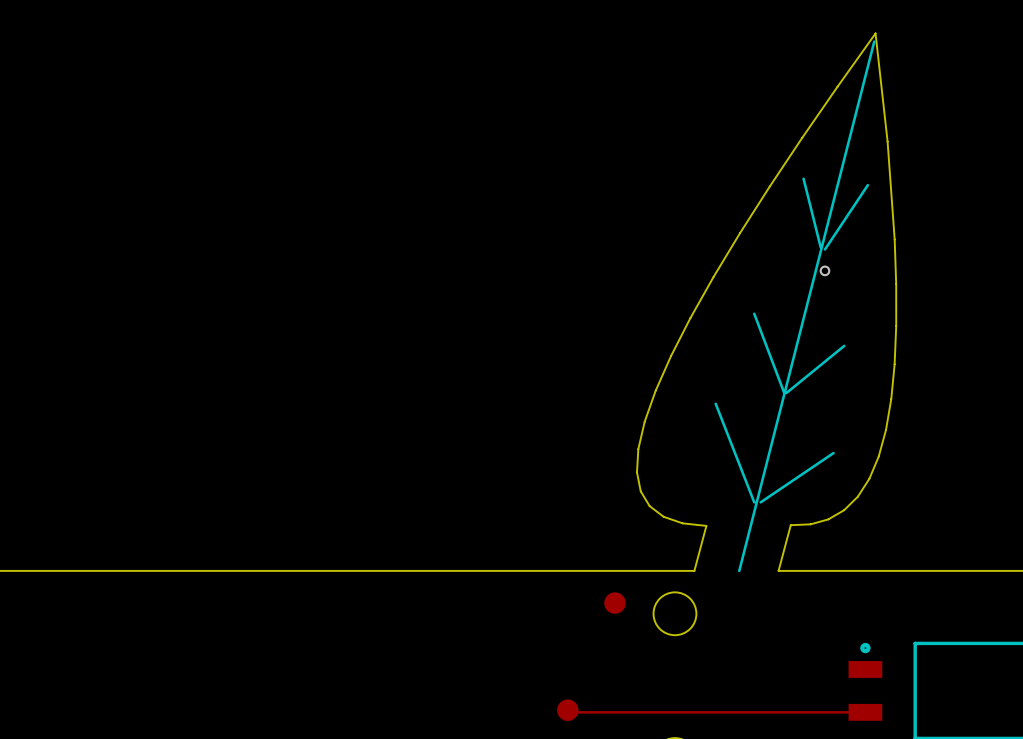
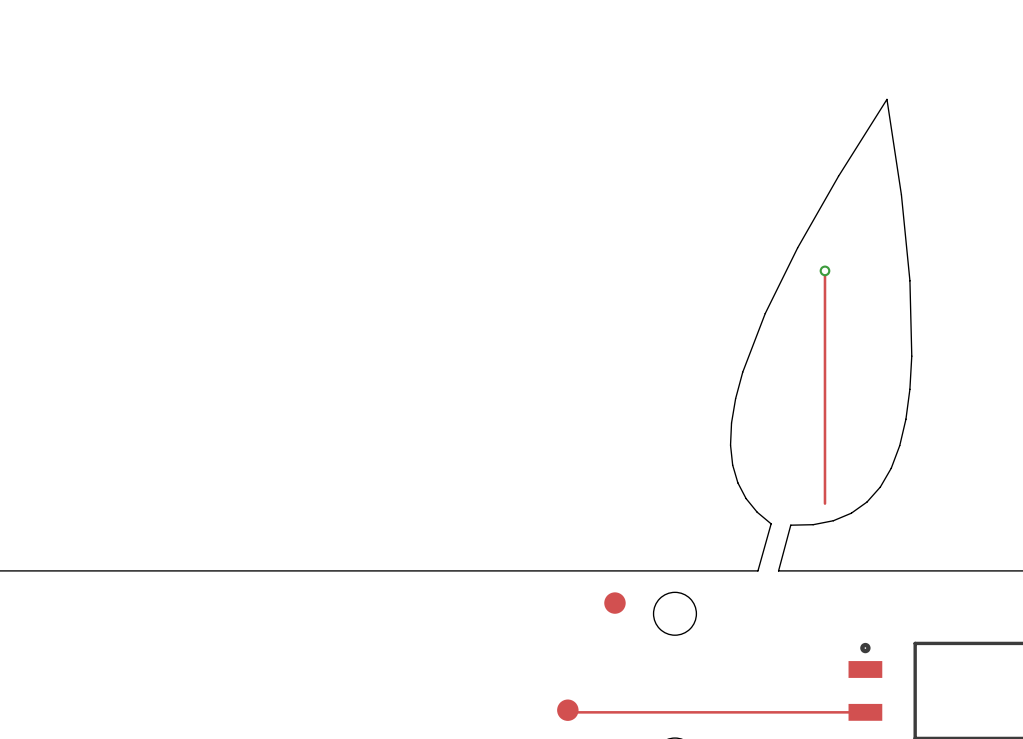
line: (874, 41) (739, 570) -> none
line: (803, 178) (820, 247) -> none
line: (867, 185) (824, 249) -> none
top track: none -> (824, 270) (824, 503)
line: (754, 313) (784, 393) -> none
line: (844, 345) (786, 393) -> none
line: (715, 403) (754, 502) -> none
line: (833, 453) (760, 502) -> none
board edge: (790, 525) (810, 524) (828, 519) (844, 510) (857, 496) (869, 478) (878, 456) (886, 429) (894, 364) (896, 284) (887, 141) (875, 33) (769, 186) (713, 276) (671, 355) (644, 421) (638, 449) (636, 472) (640, 491) (649, 506) (663, 516) (682, 523) (706, 525) (694, 570) -> (790, 525) (813, 524) (833, 520) (851, 513) (867, 502) (880, 487) (891, 468) (899, 445) (905, 419) (911, 356) (909, 280) (901, 194) (886, 99) (838, 176) (797, 247) (765, 313) (742, 372) (731, 423) (730, 445) (732, 465) (737, 482) (746, 498) (757, 512) (771, 523) (757, 570) (694, 570)

